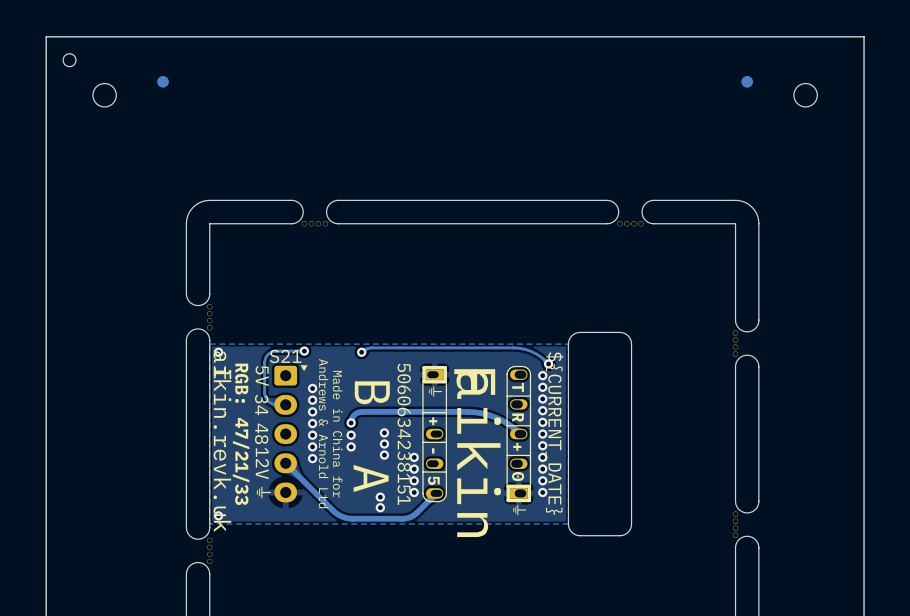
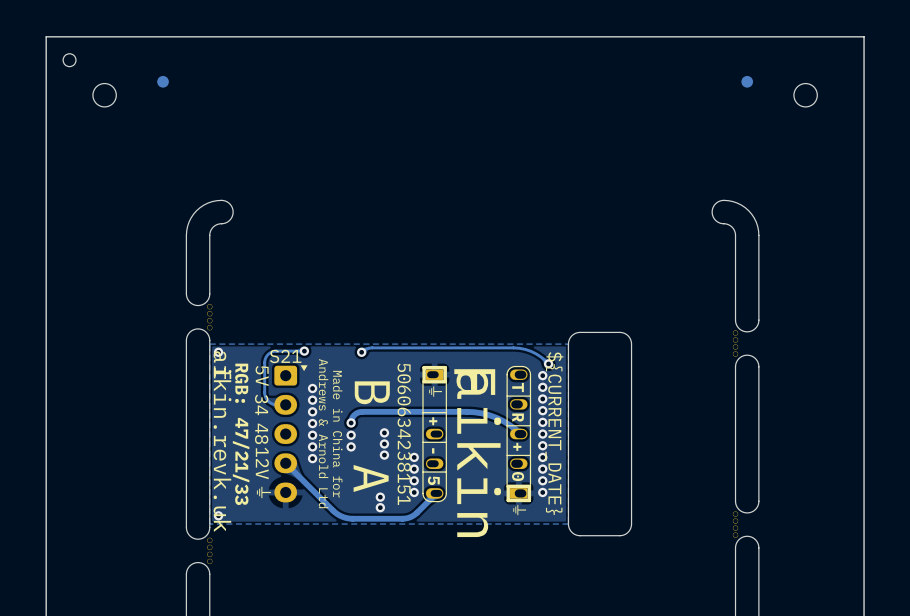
board edge: (291, 200) (202, 201) (193, 207) (188, 213) (186, 235) -> (209, 235) (214, 226) (225, 222) (231, 217) (232, 209) (227, 201) (212, 201) (200, 207) (191, 217) (186, 235)
board edge: (607, 200) (338, 200) -> none
board edge: (653, 200) (743, 201) (750, 205) (756, 213) (758, 235) -> (735, 235) (731, 226) (719, 222) (713, 217) (712, 209) (717, 201) (732, 201) (745, 207) (756, 222) (758, 235)
part: (314, 213) -> none
part: (630, 213) -> none
board edge: (291, 223) (209, 223) (209, 235) -> none
board edge: (607, 223) (338, 223) -> none
board edge: (653, 223) (735, 223) (735, 235) -> none

